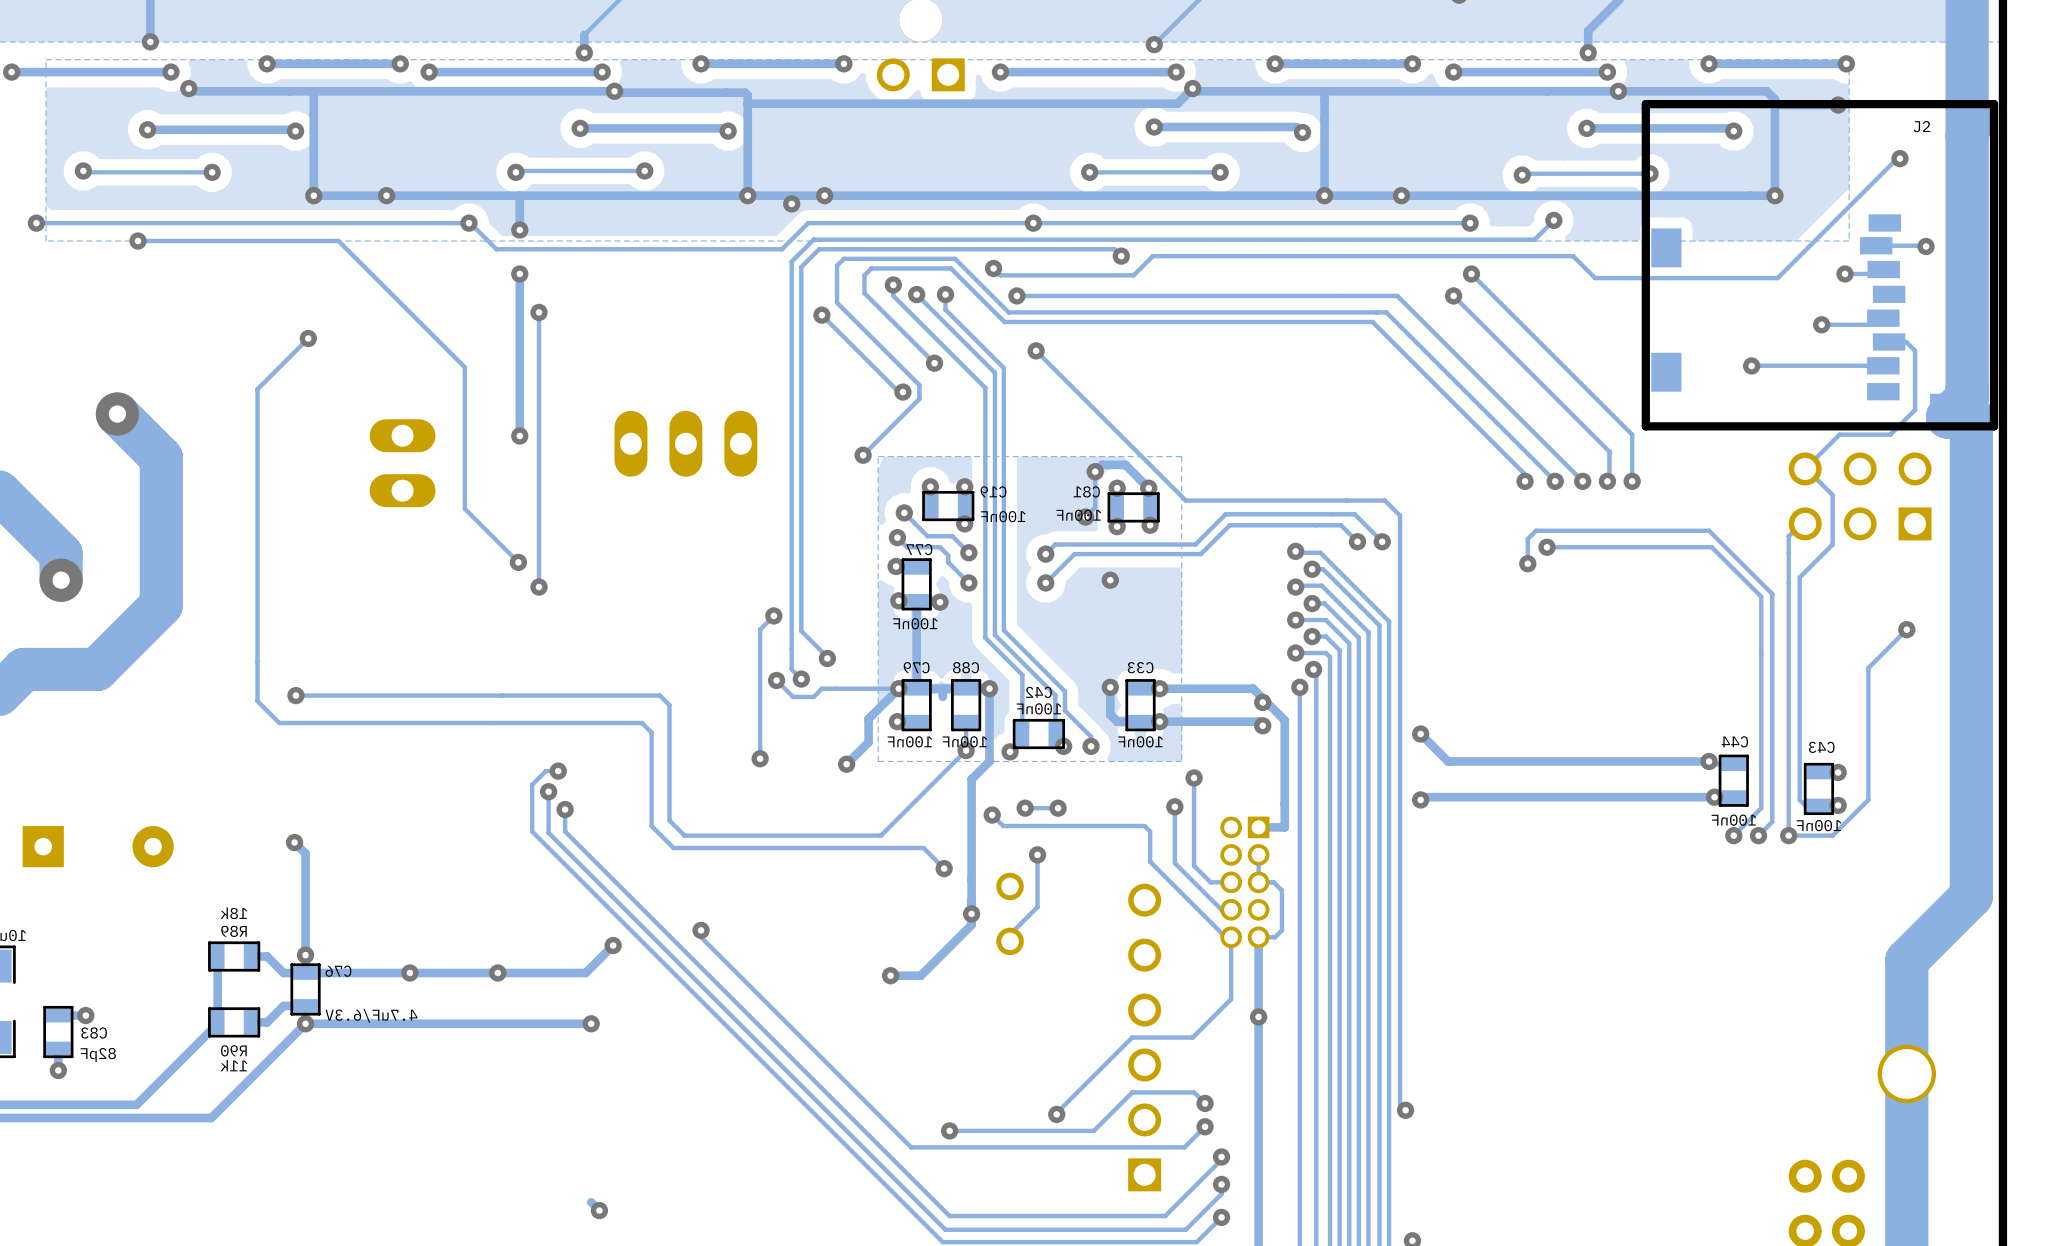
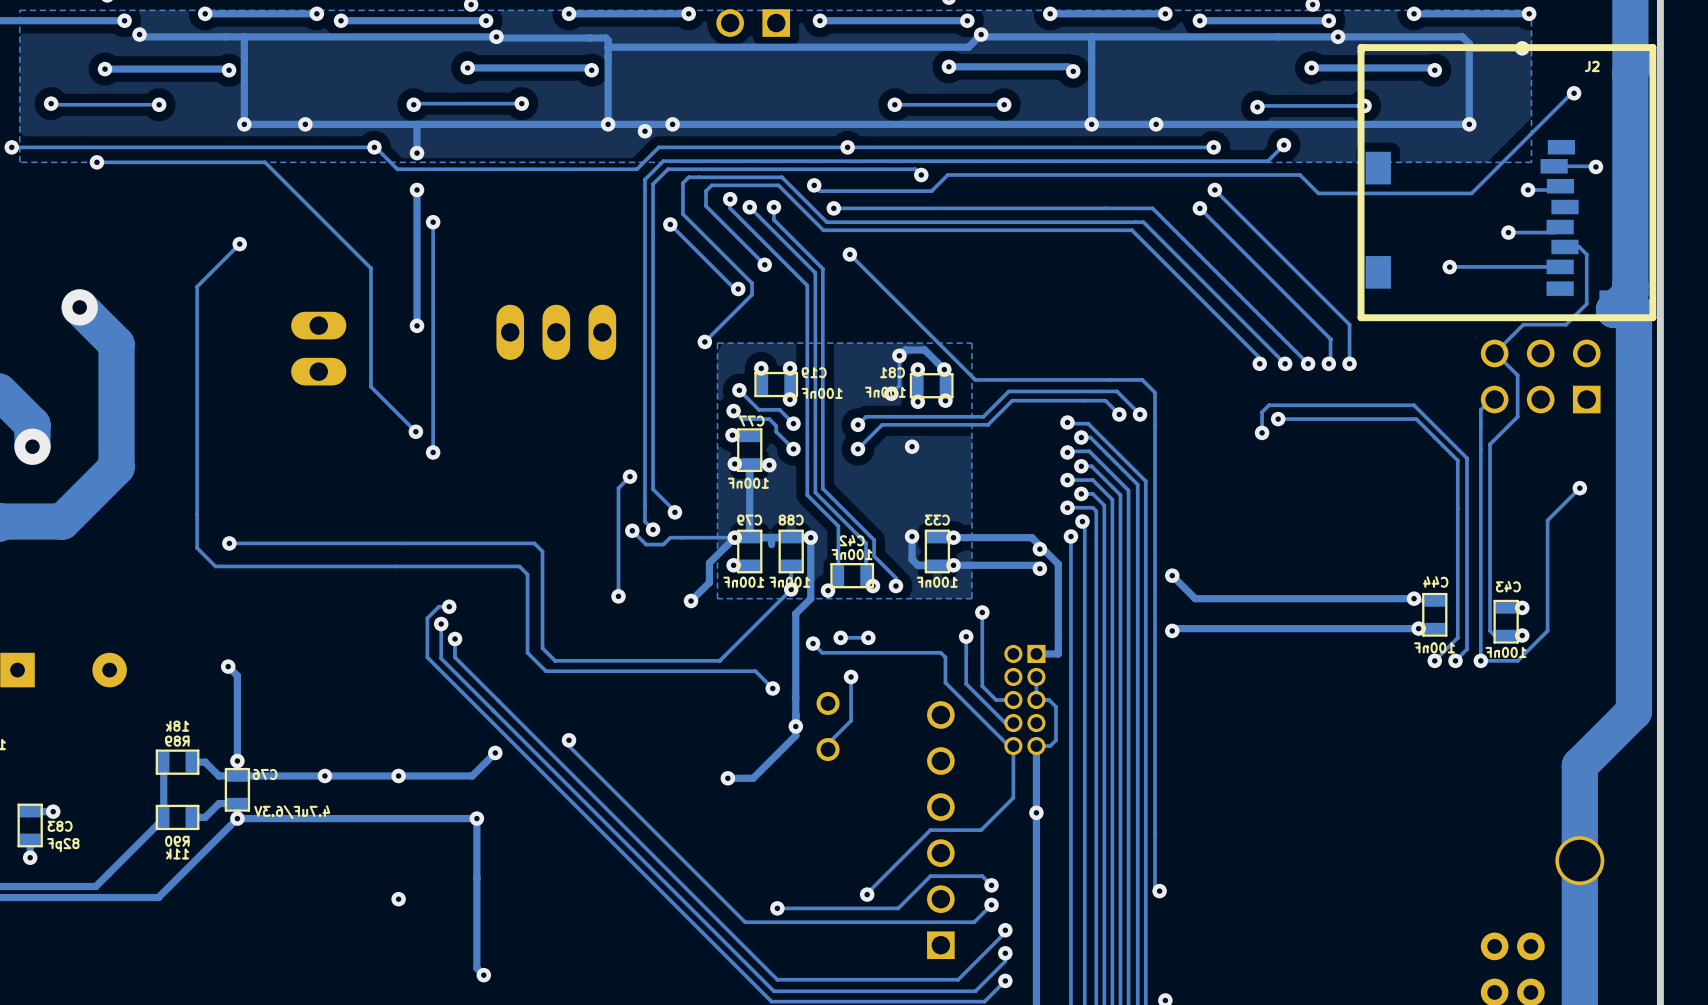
track: none -> (476, 819) (476, 968)
via: none -> (398, 899)

